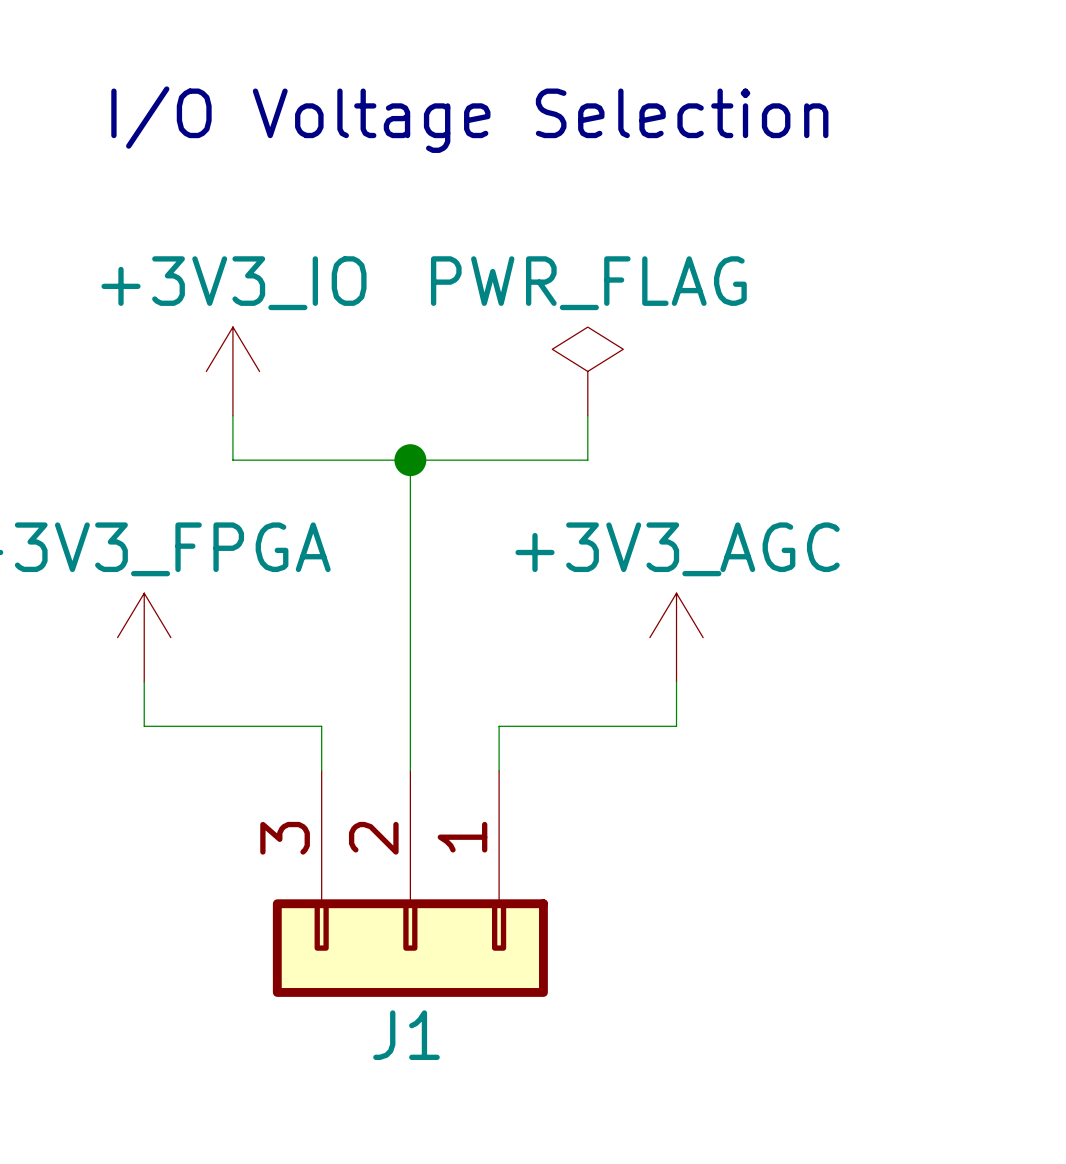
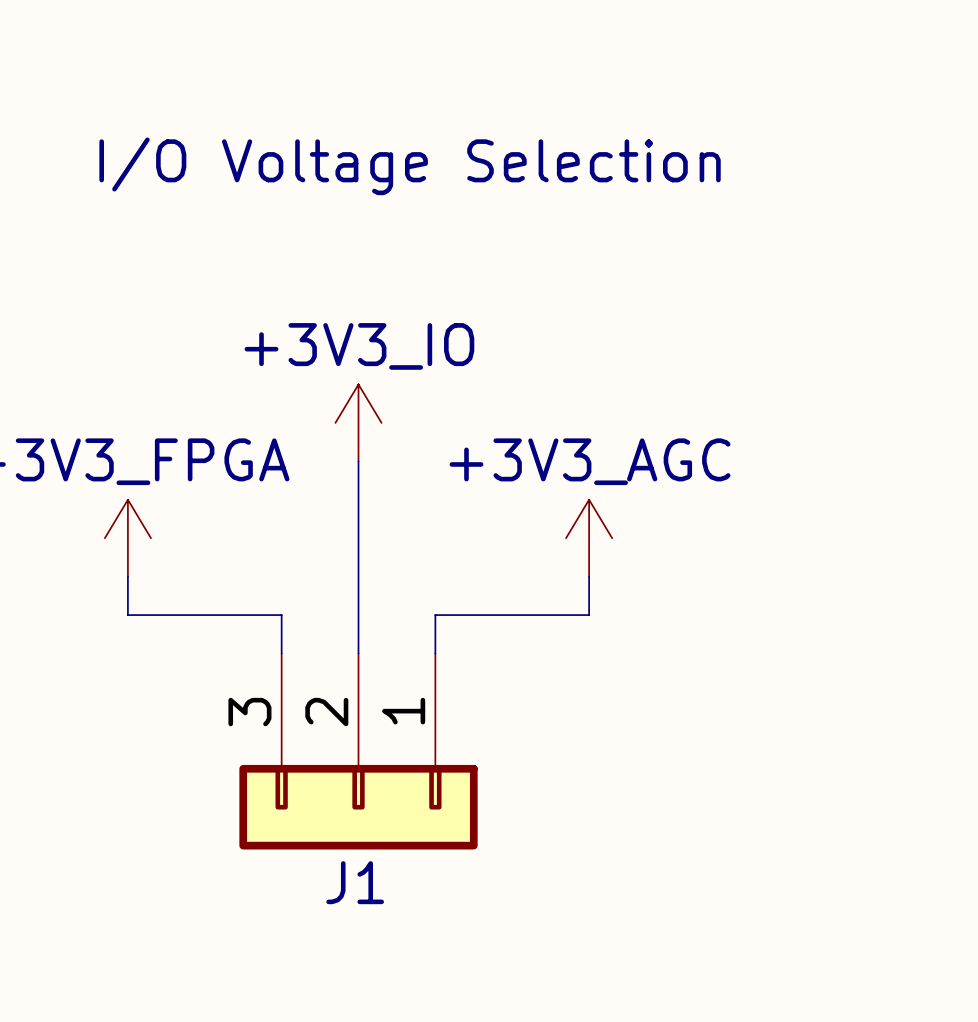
text position: I/O Voltage Selection (469, 119) -> I/O Voltage Selection (410, 166)
power symbol position: +3V3_IO (232, 371) -> +3V3_IO (358, 422)
power symbol: PWR_FLAG (587, 371) -> none
wire: (232, 415) (232, 460) (587, 460) (587, 415) -> none
junction: (410, 460) -> none

